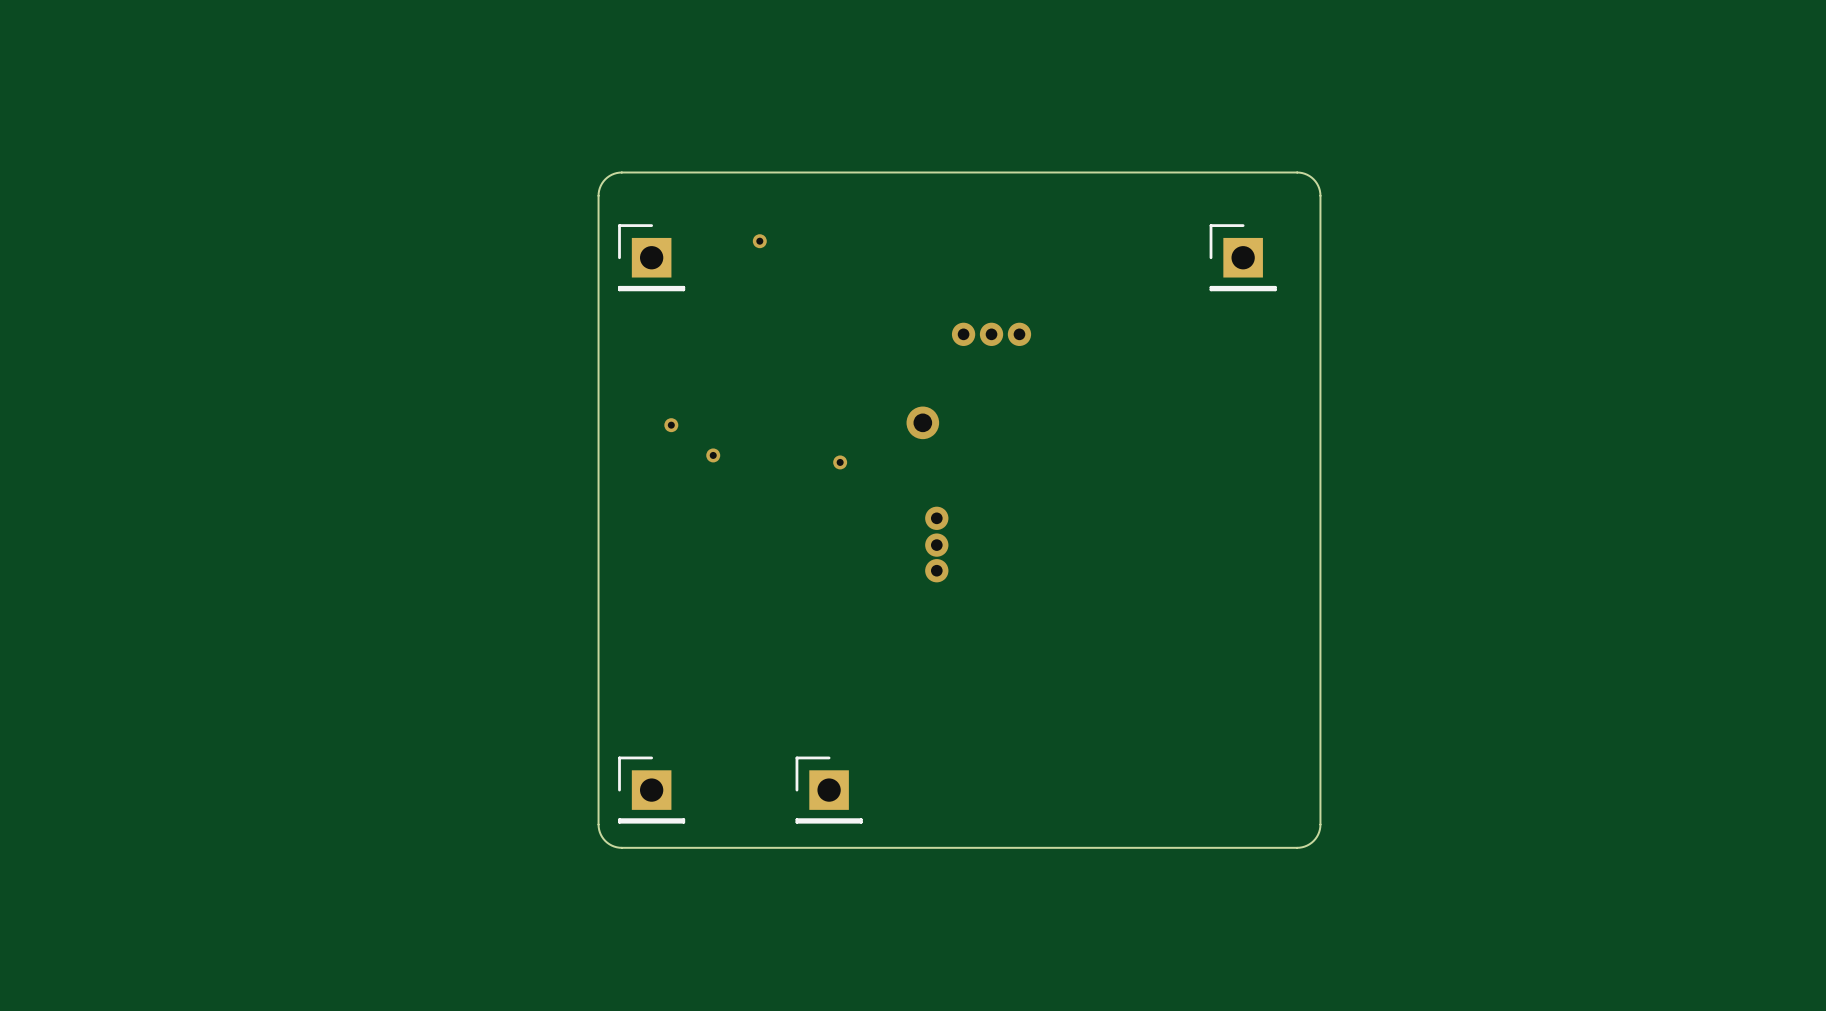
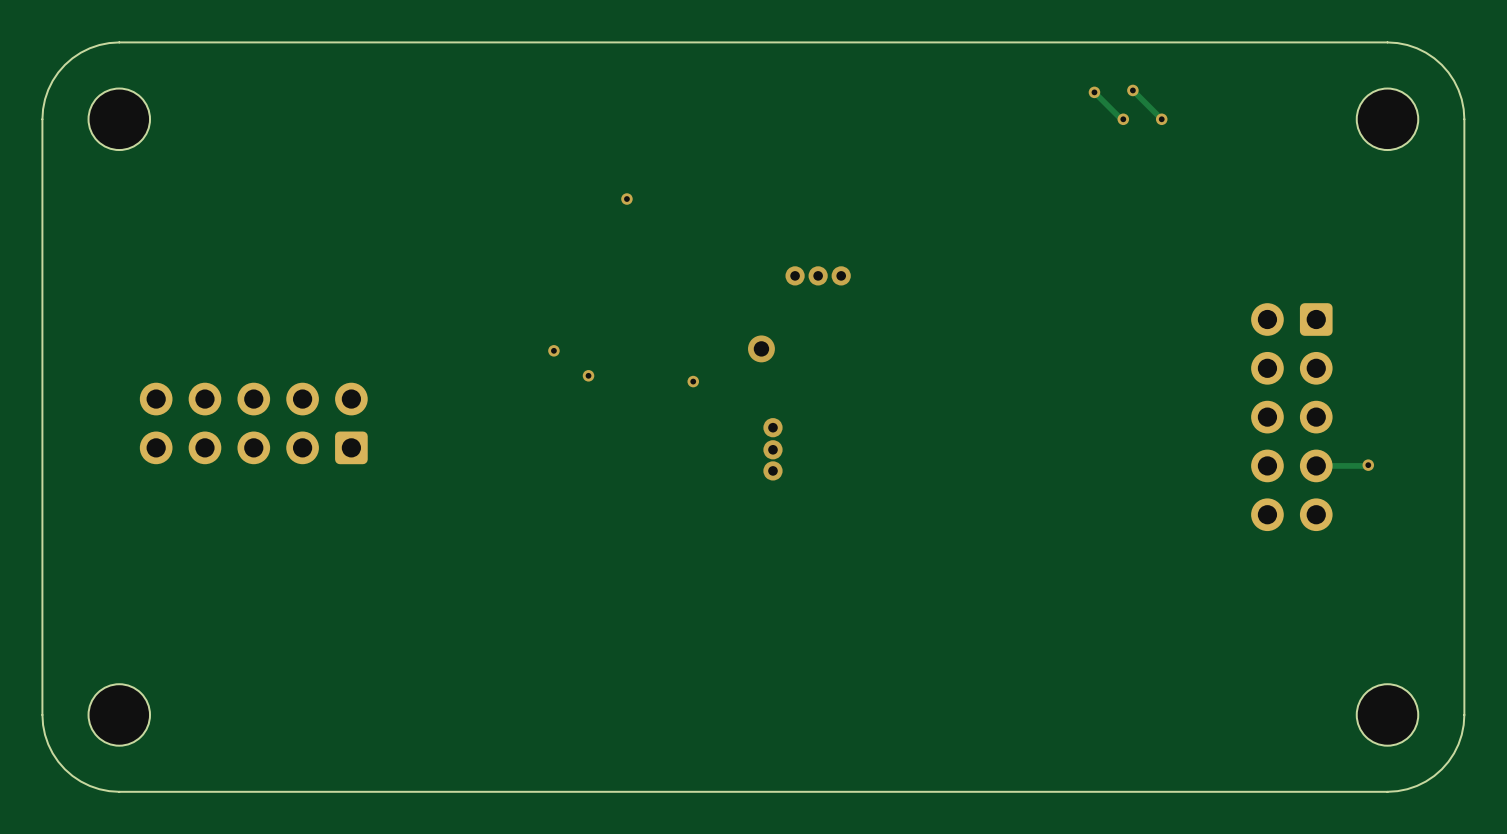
board edge: none -> (1387, 42) (119, 42) (99, 45) (80, 52) (64, 64) (52, 80) (45, 99) (42, 119) (42, 714) (45, 734) (52, 753) (64, 769) (80, 781) (99, 789) (119, 791) (1387, 791) (1407, 789) (1425, 781) (1441, 769) (1454, 753) (1461, 734) (1464, 714) (1464, 119) (1458, 89) (1441, 64) (1416, 48) (1387, 42)
track: none -> (1132, 90) (1161, 119)
via: none -> (1132, 90)
track: none -> (1094, 92) (1123, 119)
via: none -> (1094, 92)
part: none -> (119, 119)
via: none -> (1123, 119)
via: none -> (1161, 119)
part: none -> (1387, 119)
board edge: (1297, 172) (621, 172) (611, 174) (605, 179) (600, 185) (598, 195) (598, 824) (600, 834) (605, 841) (611, 845) (621, 847) (1297, 847) (1307, 845) (1313, 841) (1318, 834) (1320, 824) (1320, 195) (1318, 185) (1313, 179) (1307, 174) (1297, 172) -> none
part: (651, 257) -> none
part: (1243, 257) -> none
part: none -> (1291, 417)
part: none -> (253, 423)
track: none -> (1368, 465) (1316, 465)
via: none -> (1368, 465)
part: (651, 790) -> none
part: (829, 790) -> none
part: none -> (119, 714)
part: none -> (1387, 714)

